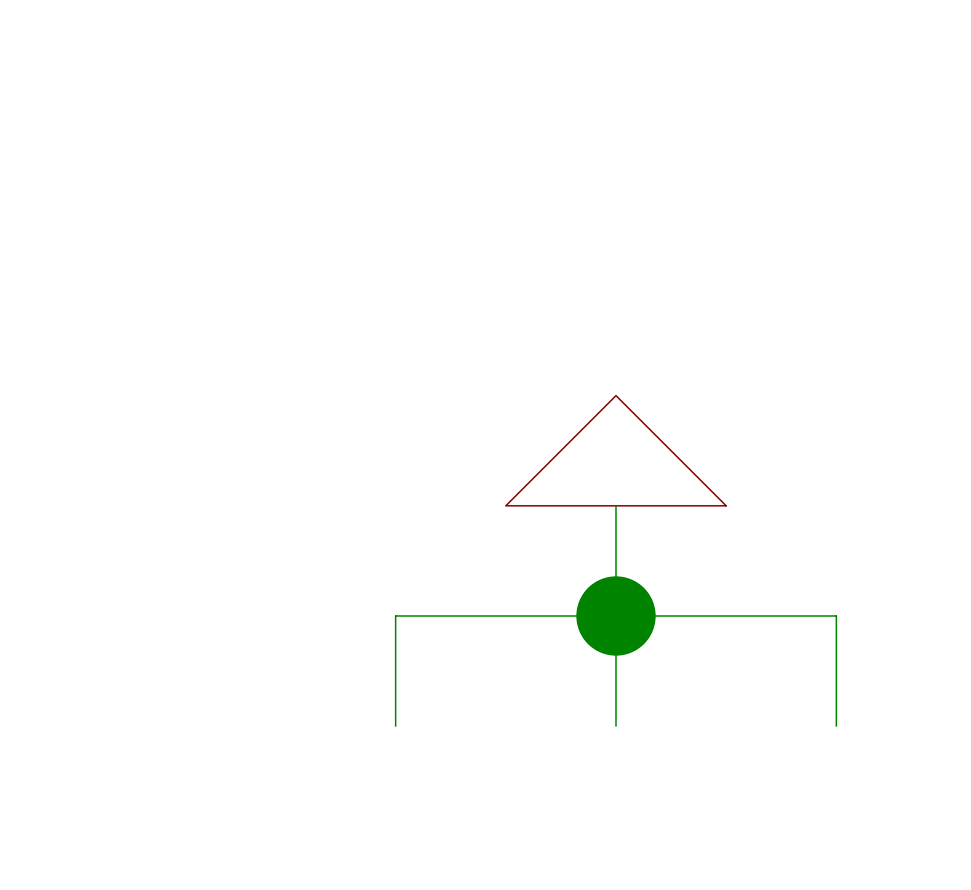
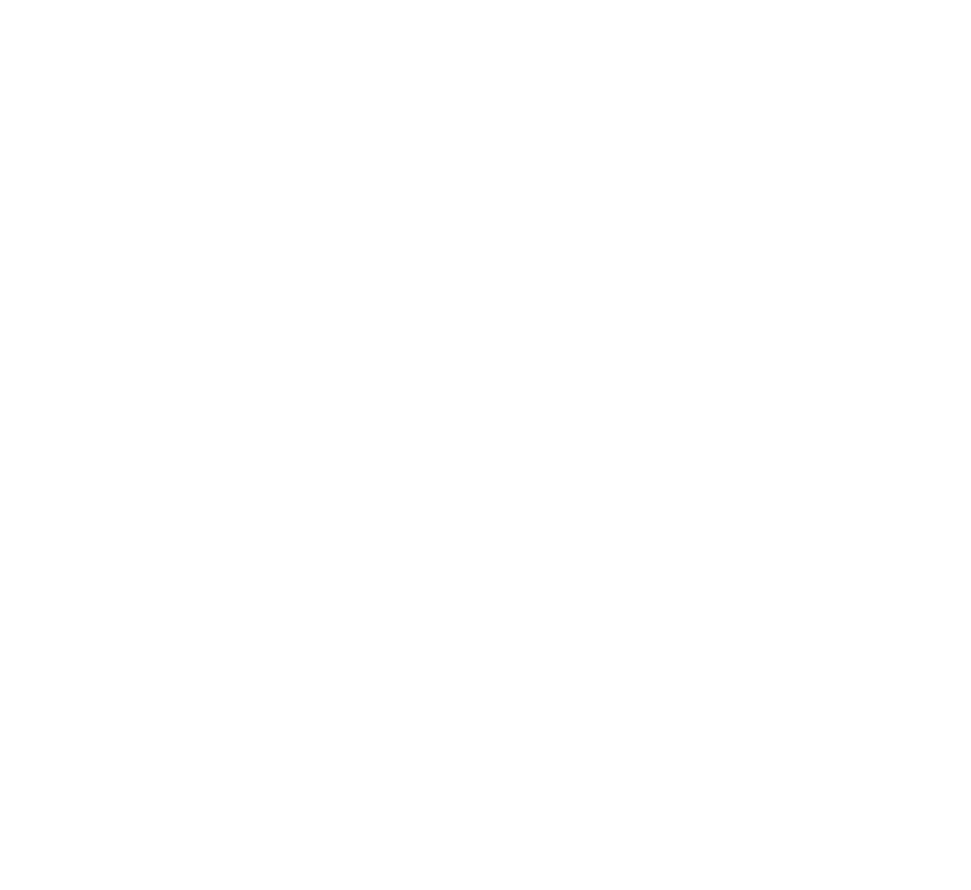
power symbol: (615, 450) -> none
wire: (615, 505) (615, 726) -> none
junction: (615, 615) -> none
wire: (395, 726) (395, 615) (836, 615) (836, 726) -> none

